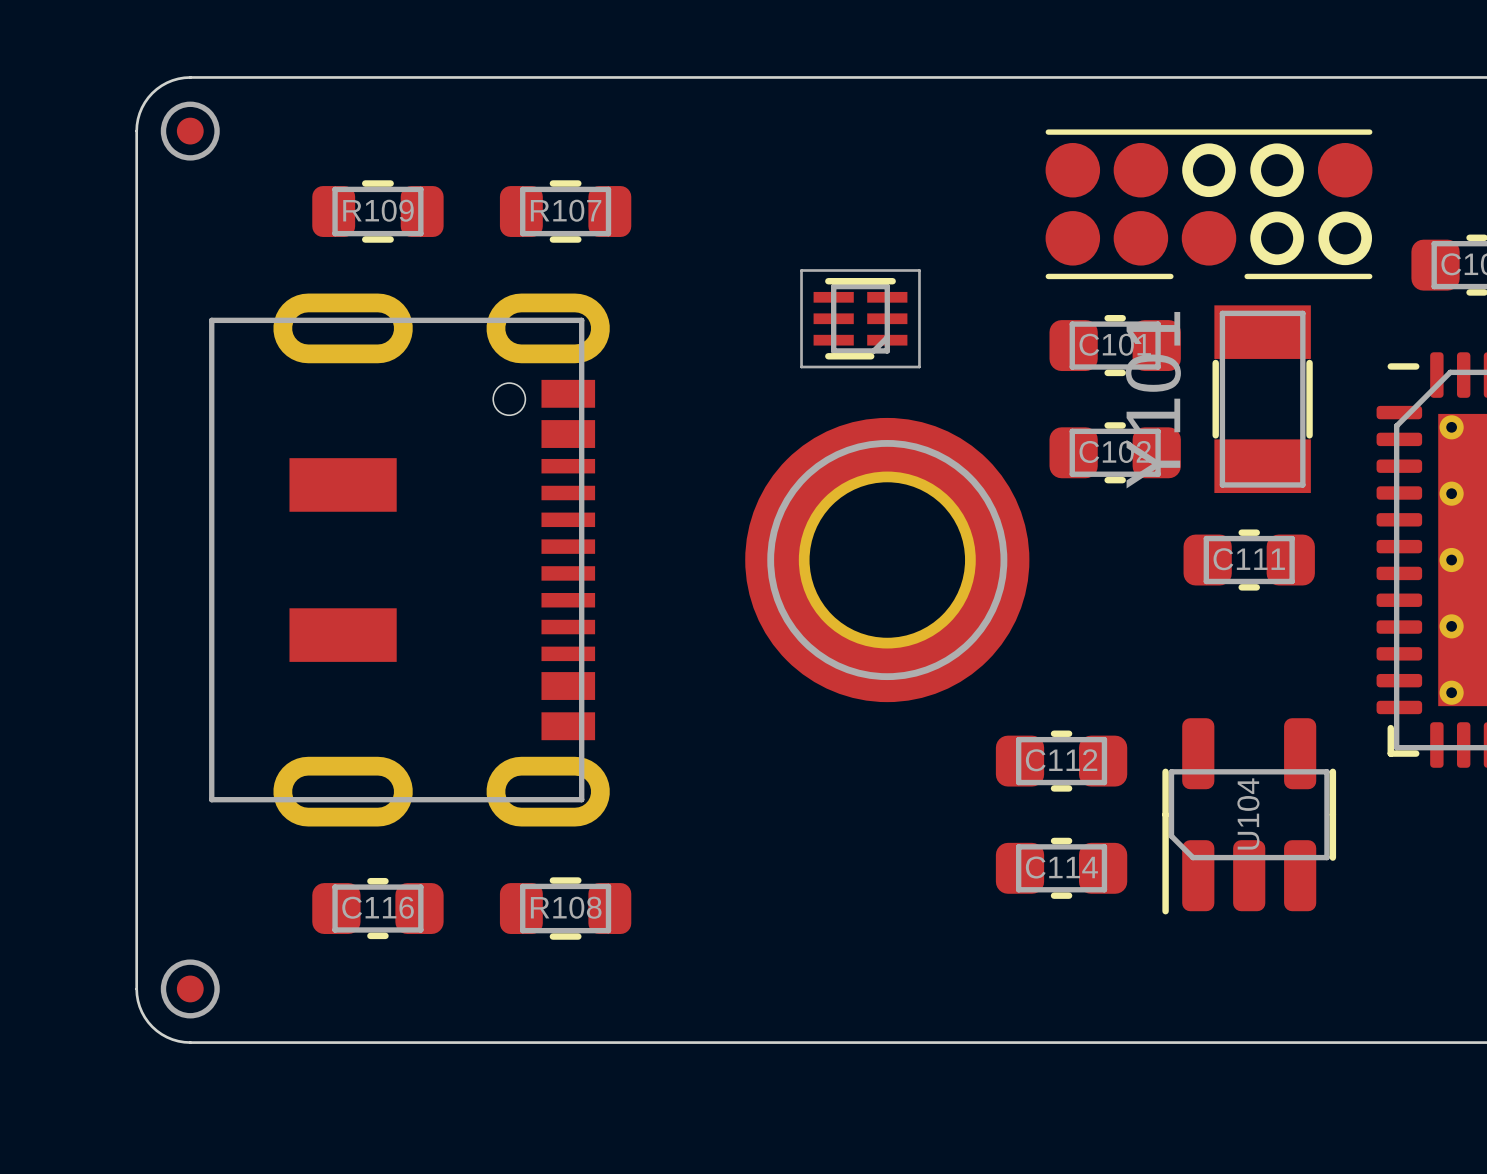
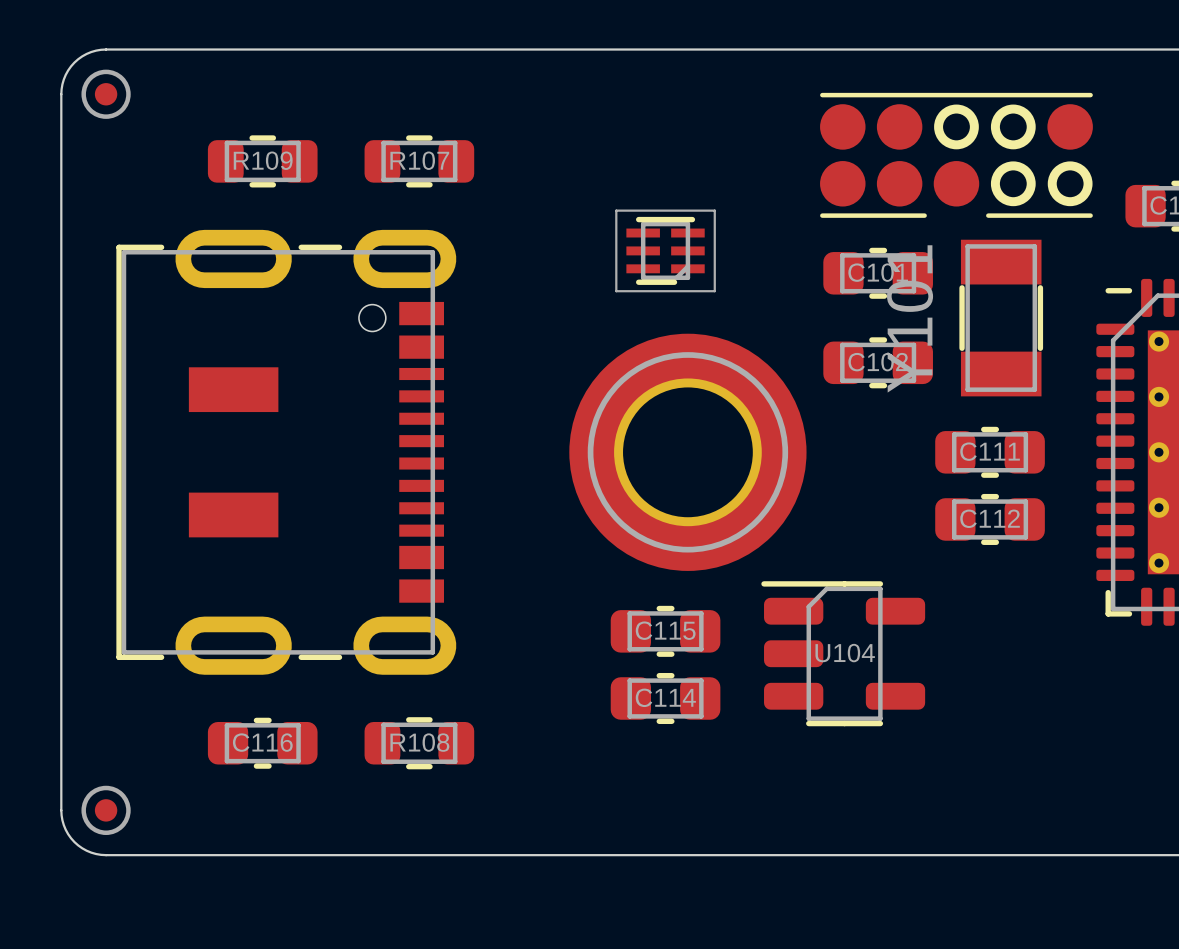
part footprint: [209, 293, 610, 827] -> [116, 229, 457, 675]
C112 position: (1061, 761) -> (990, 519)
C115: none -> (665, 631)
U104 rotation: 0° (1249, 816) -> 90° clockwise (843, 653)
U104 position: (1249, 816) -> (843, 653)
C114 position: (1061, 868) -> (665, 698)

